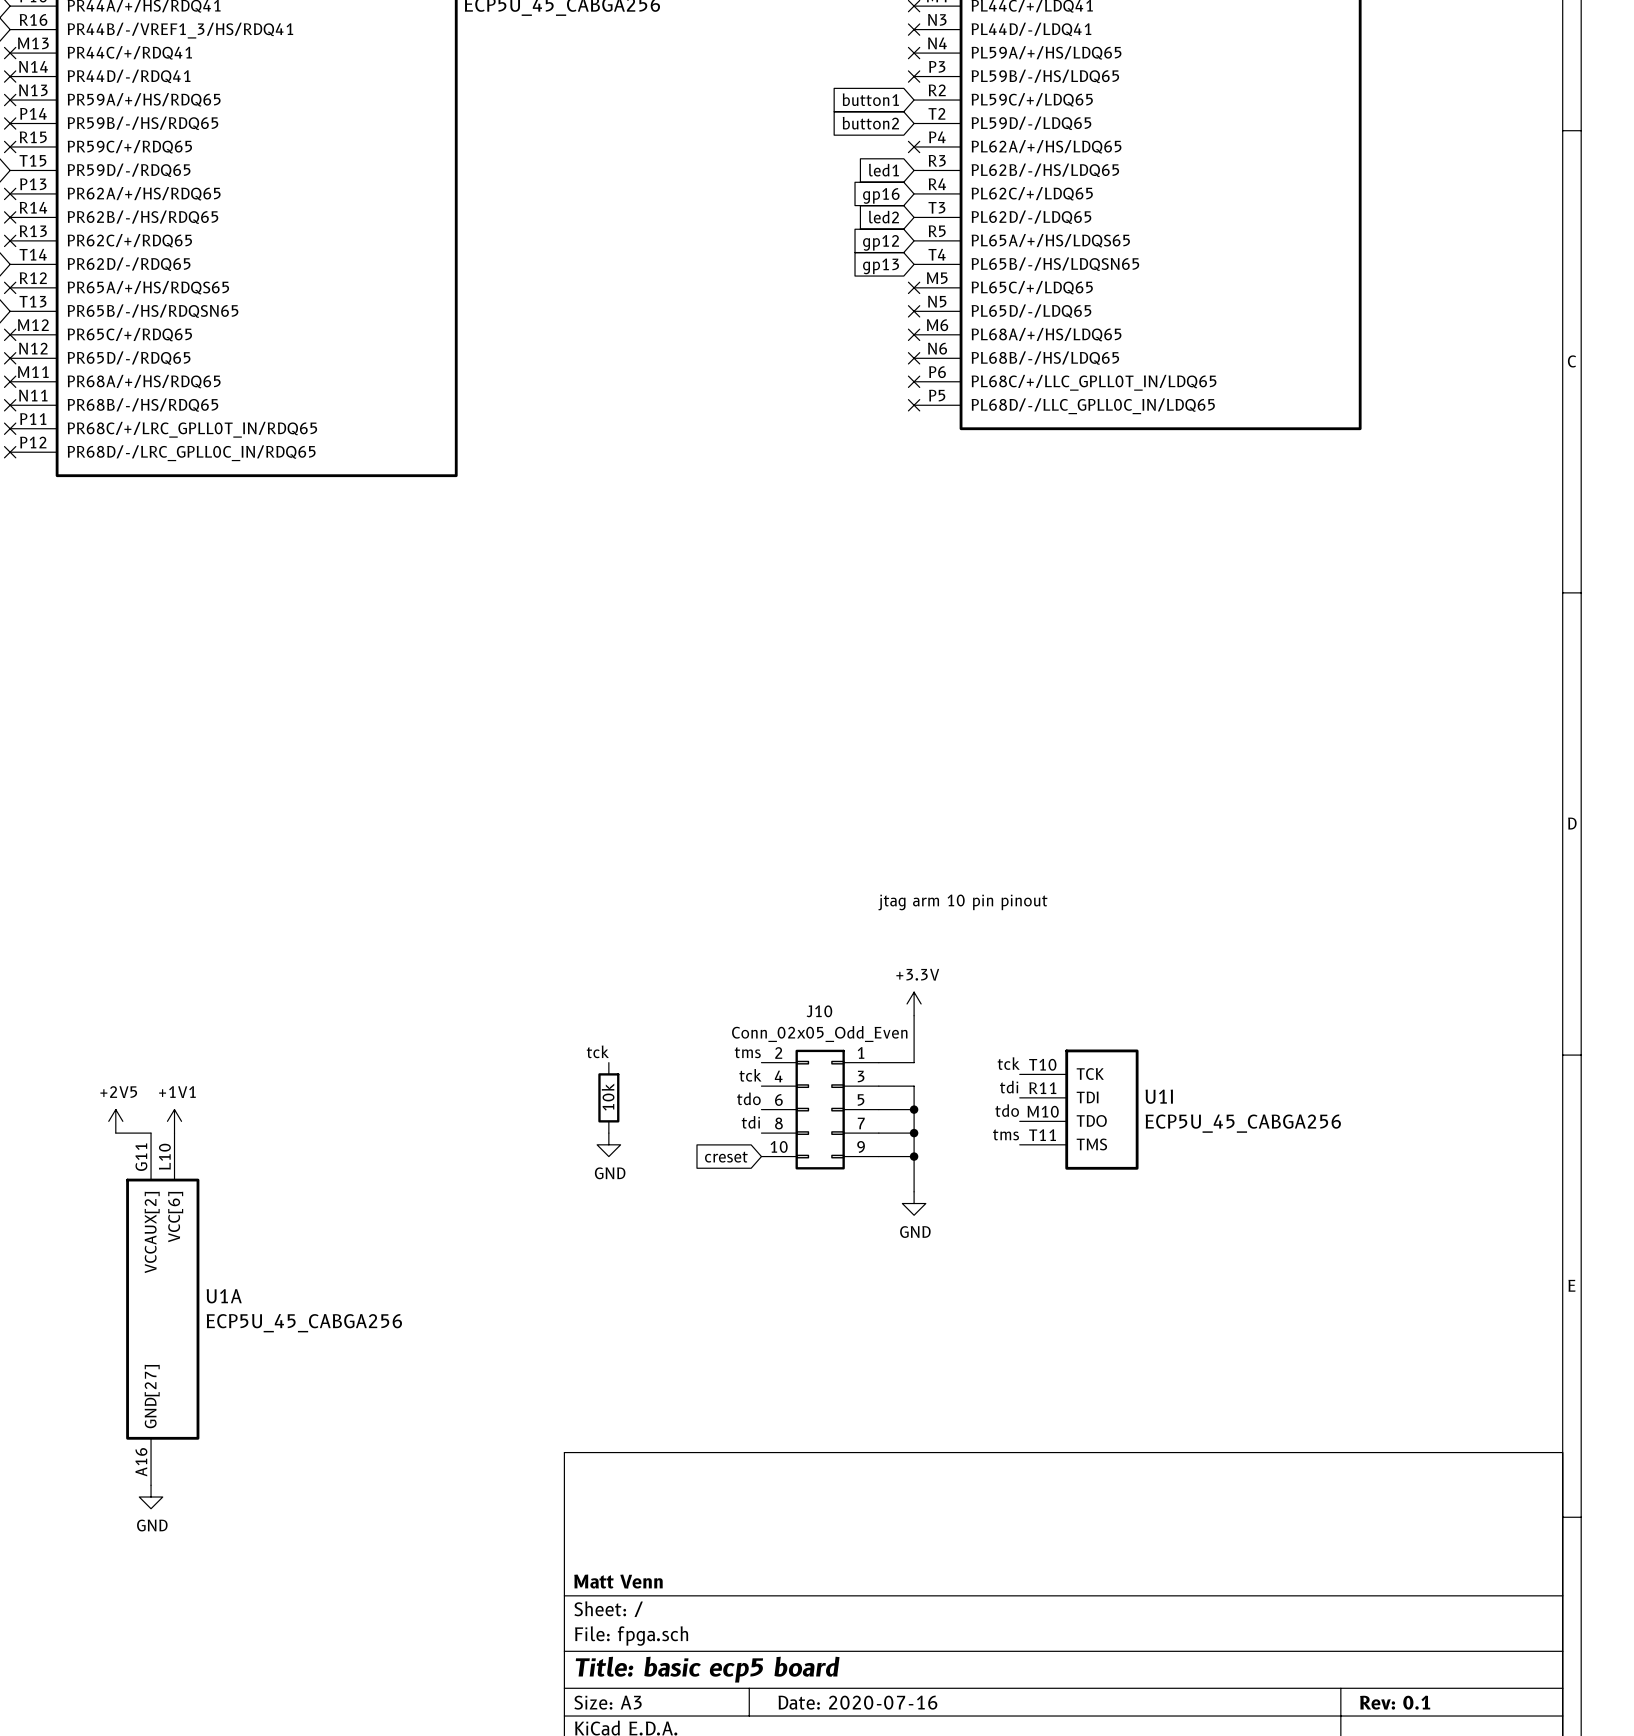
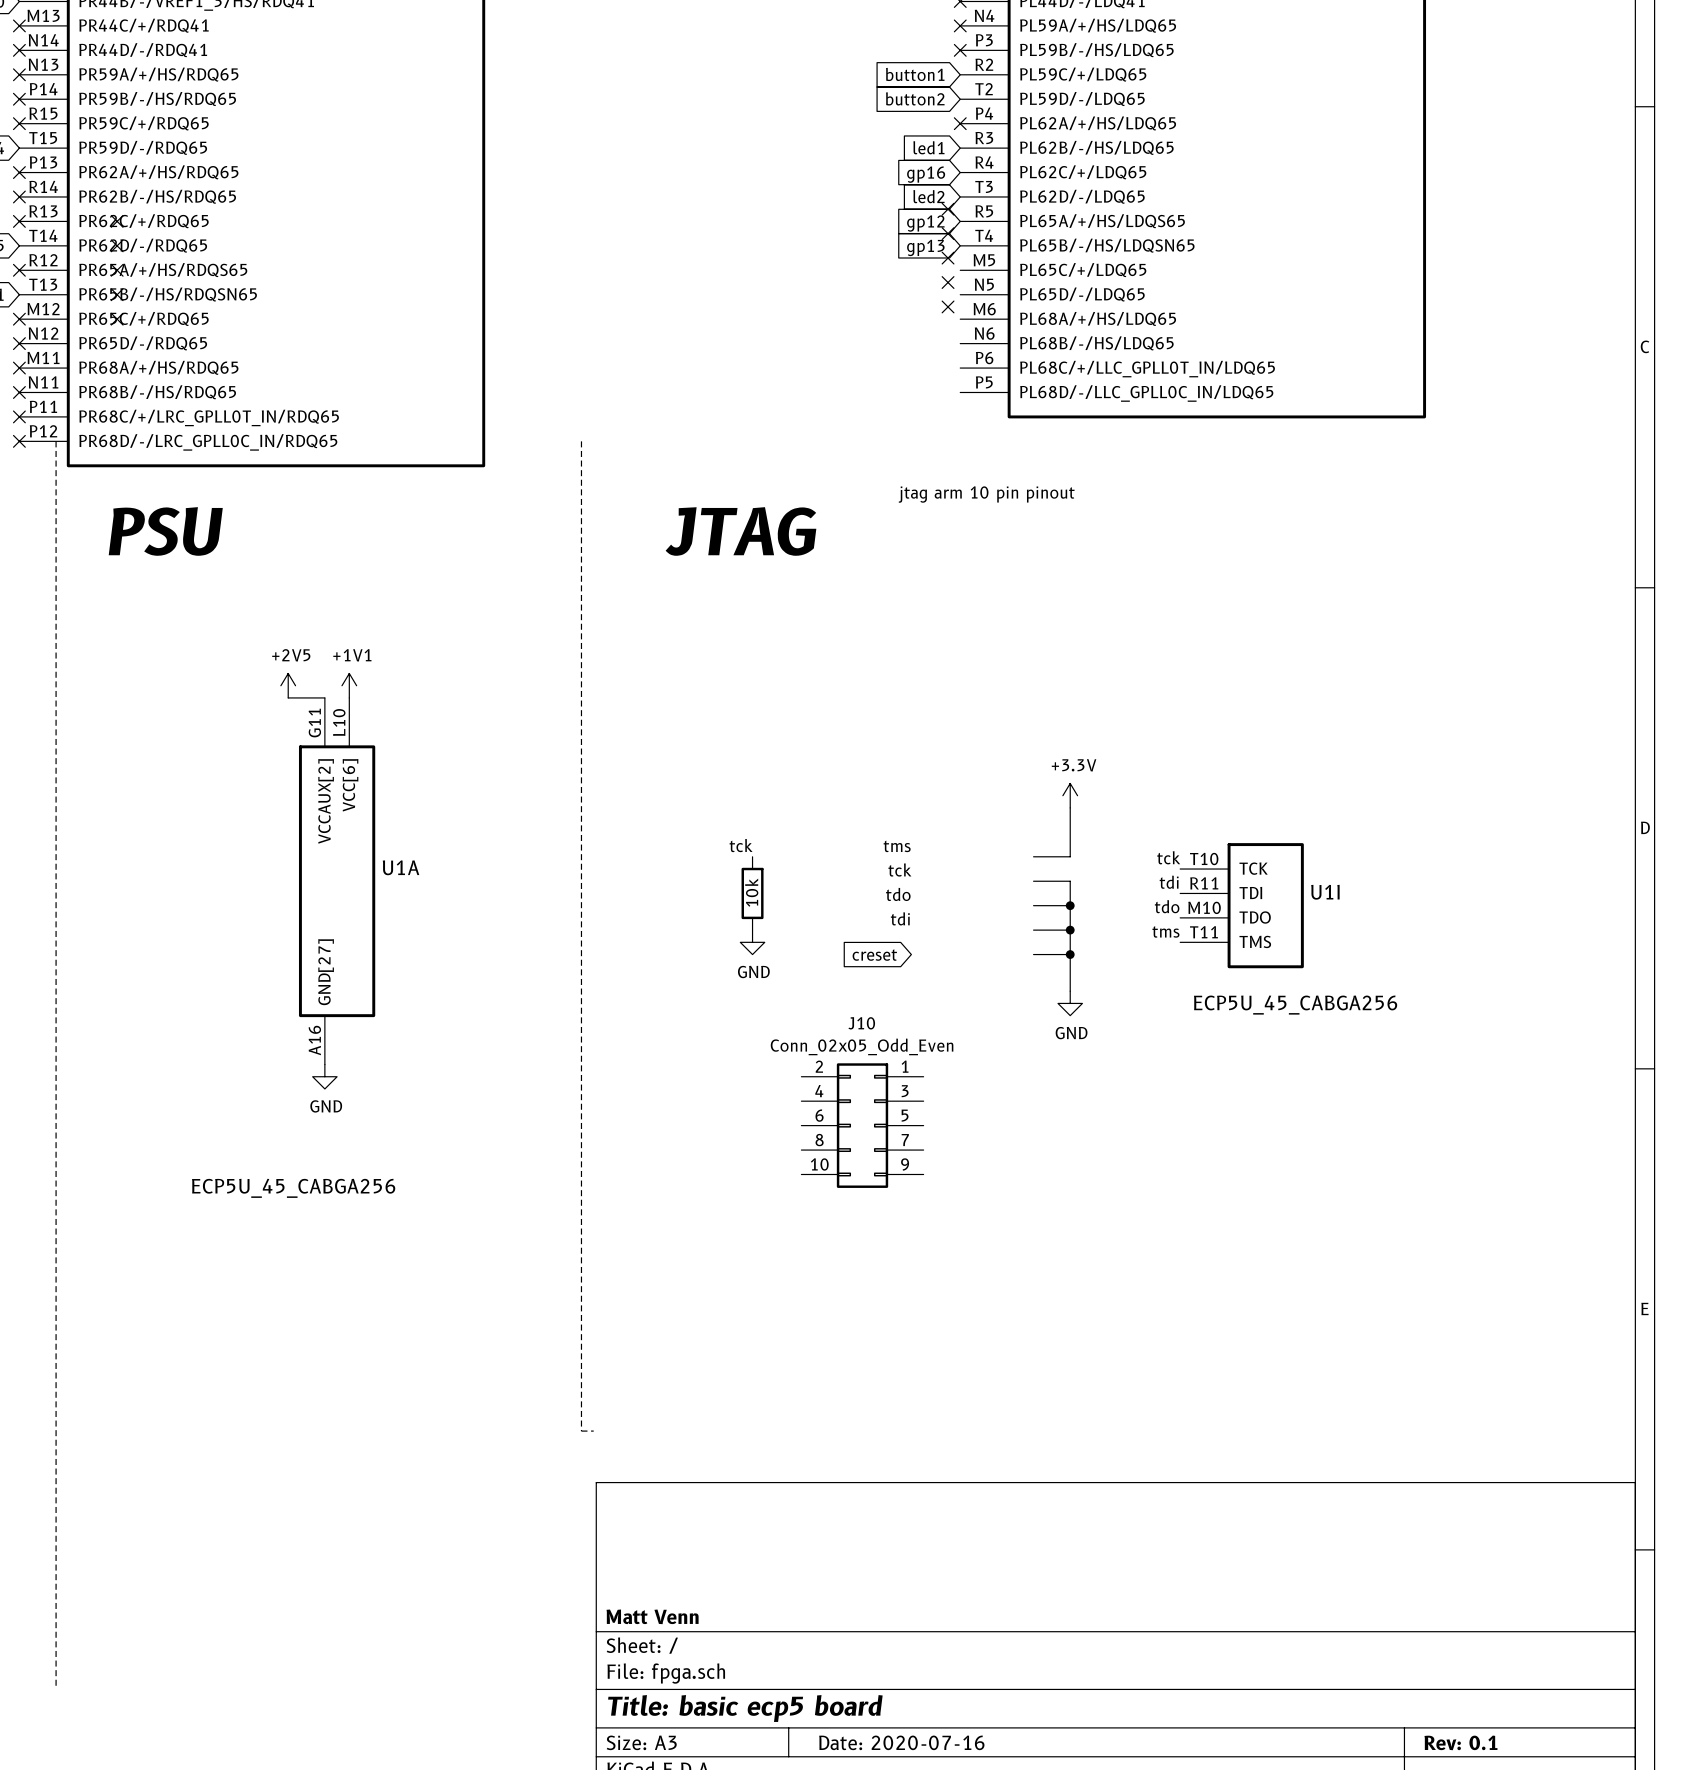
no-connect mark: none -> (948, 209)
no-connect mark: none -> (117, 221)
no-connect mark: none -> (948, 233)
no-connect mark: none -> (117, 245)
no-connect mark: none -> (948, 258)
no-connect mark: none -> (117, 270)
no-connect mark: (914, 287) -> none
no-connect mark: none -> (948, 282)
no-connect mark: none -> (117, 294)
no-connect mark: (914, 311) -> none
no-connect mark: none -> (948, 306)
no-connect mark: none -> (117, 319)
no-connect mark: (914, 334) -> none
no-connect mark: (914, 358) -> none
no-connect mark: (914, 381) -> none
no-connect mark: (914, 405) -> none
line: none -> (56, 441) (56, 1687)
line: none -> (581, 441) (581, 1431) (593, 1431)
text: none -> jtag arm 10 pin pinout (986, 494)
text: none -> PSU (165, 531)
text: none -> JTAG (741, 531)
power symbol: none -> +2V5 (288, 685)
power symbol: none -> +1V1 (349, 685)
wire: none -> (288, 697) (324, 697)
power symbol: none -> +3.3V (1070, 795)
wire: none -> (1070, 807) (1070, 856) (1033, 856)
label: none -> tck (741, 845)
label: none -> tms (897, 846)
label: none -> tck (1168, 857)
label: none -> tck (899, 870)
wire: none -> (1033, 881) (1070, 881) (1070, 991)
label: none -> tdi (1169, 882)
part: none -> 10k (752, 893)
label: none -> tdo (898, 894)
wire: none -> (1033, 905) (1070, 905)
junction: none -> (1070, 905)
label: none -> tdo (1167, 906)
text: jtag arm 10 pin pinout (962, 902) -> none
label: none -> tdi (900, 918)
junction: none -> (1070, 930)
label: none -> tms (1165, 931)
power symbol: none -> GND (752, 942)
global label: none -> creset (874, 955)
junction: none -> (1070, 954)
power symbol: none -> GND (1070, 1003)
power symbol: +3.3V (914, 1003) -> none
wire: (914, 1015) (914, 1062) (878, 1062) -> none
label: tck (597, 1051) -> none
label: tms (747, 1052) -> none
power symbol: none -> GND (324, 1076)
label: tck (1008, 1063) -> none
label: tck (750, 1075) -> none
wire: (878, 1086) (914, 1086) (914, 1191) -> none
label: tdi (1009, 1087) -> none
part: 10k (608, 1097) -> none
label: tdo (748, 1098) -> none
wire: (878, 1109) (914, 1109) -> (1033, 930) (1070, 930)
junction: (914, 1109) -> none
U1I position: (1079, 1109) -> (1242, 905)
label: tdo (1007, 1110) -> none
power symbol: +2V5 (115, 1121) -> none
power symbol: +1V1 (174, 1121) -> none
label: tdi (750, 1122) -> none
U1I value position: ECP5U_45_CABGA256 (1243, 1123) -> ECP5U_45_CABGA256 (1295, 1005)
wire: (115, 1133) (151, 1133) -> none
wire: (878, 1133) (914, 1133) -> (1033, 954) (1070, 954)
junction: (914, 1133) -> none
label: tms (1006, 1134) -> none
power symbol: GND (608, 1144) -> none
wire: (878, 1156) (914, 1156) -> none
junction: (914, 1156) -> none
global label: creset (726, 1157) -> none
power symbol: GND (914, 1203) -> none
U1A position: (162, 1309) -> (337, 881)
U1A value position: ECP5U_45_CABGA256 (304, 1323) -> ECP5U_45_CABGA256 (293, 1188)
power symbol: GND (151, 1497) -> none

